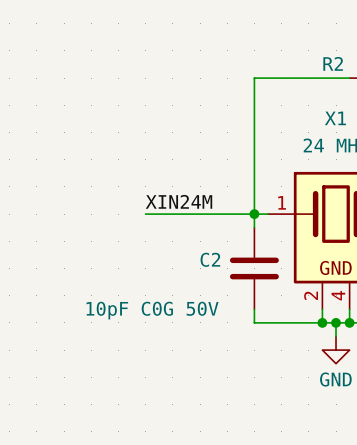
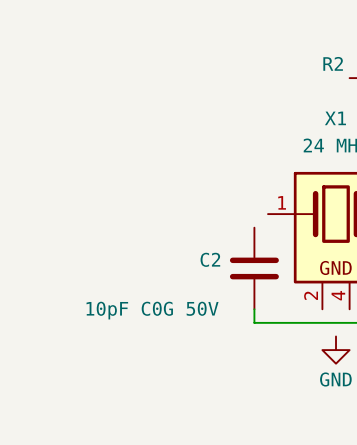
wire: (349, 78) (254, 78) (254, 227) -> none
label: XIN24M (178, 201) -> none
wire: (145, 214) (268, 214) -> none
junction: (254, 214) -> none
wire: (322, 309) (322, 322) -> none
wire: (349, 309) (349, 322) -> none
junction: (322, 322) -> none
wire: (336, 322) (336, 336) -> none
junction: (336, 322) -> none
junction: (349, 322) -> none

